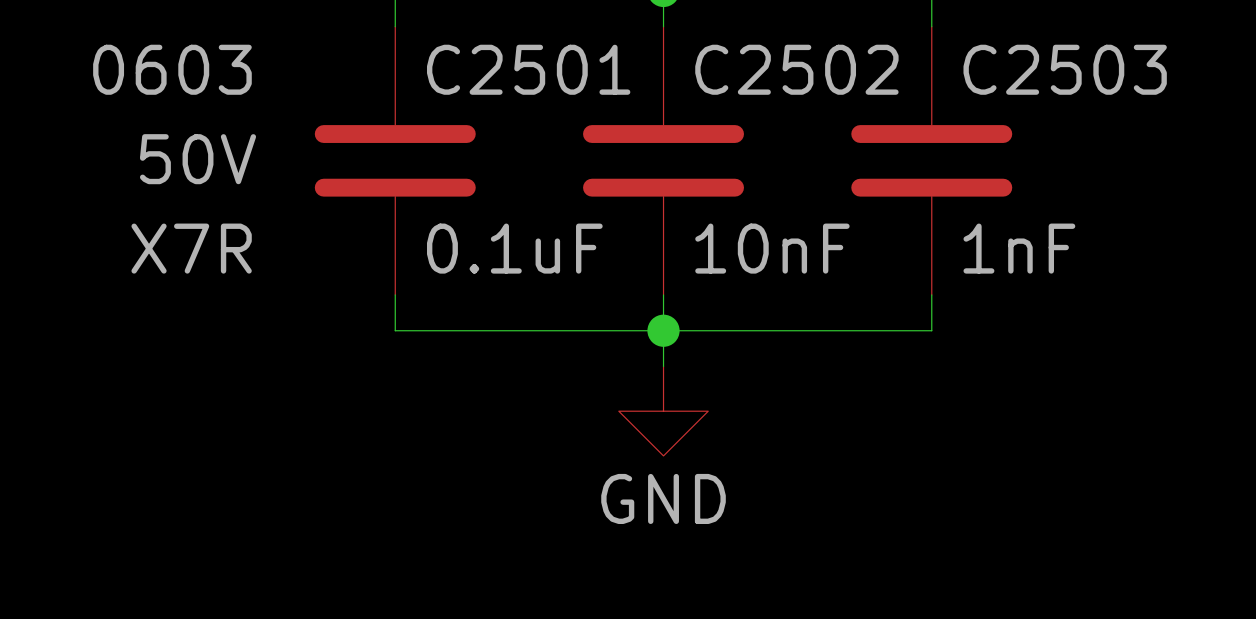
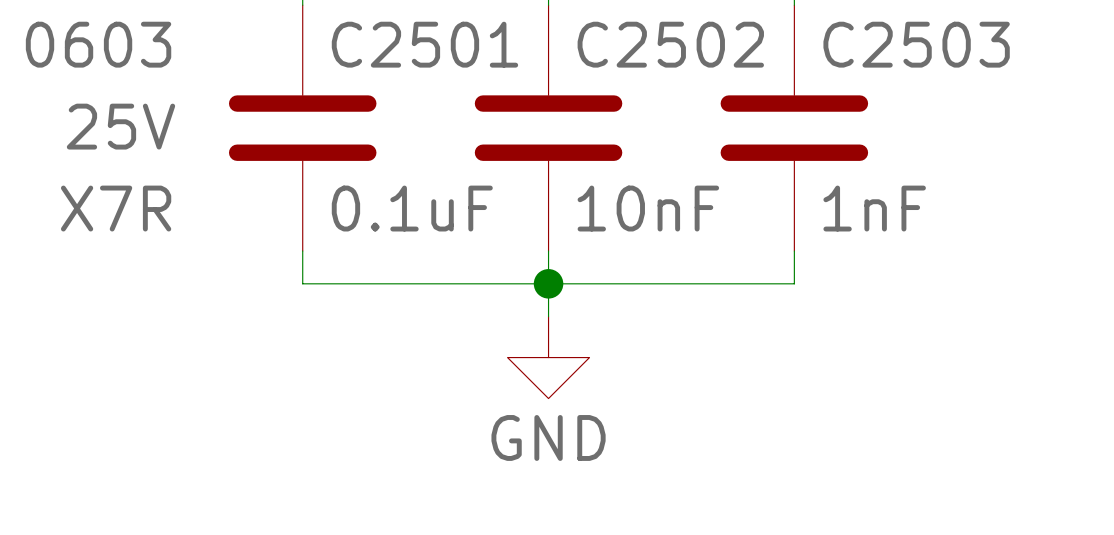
C2501 text: 50V (198, 159) -> 25V (120, 126)

